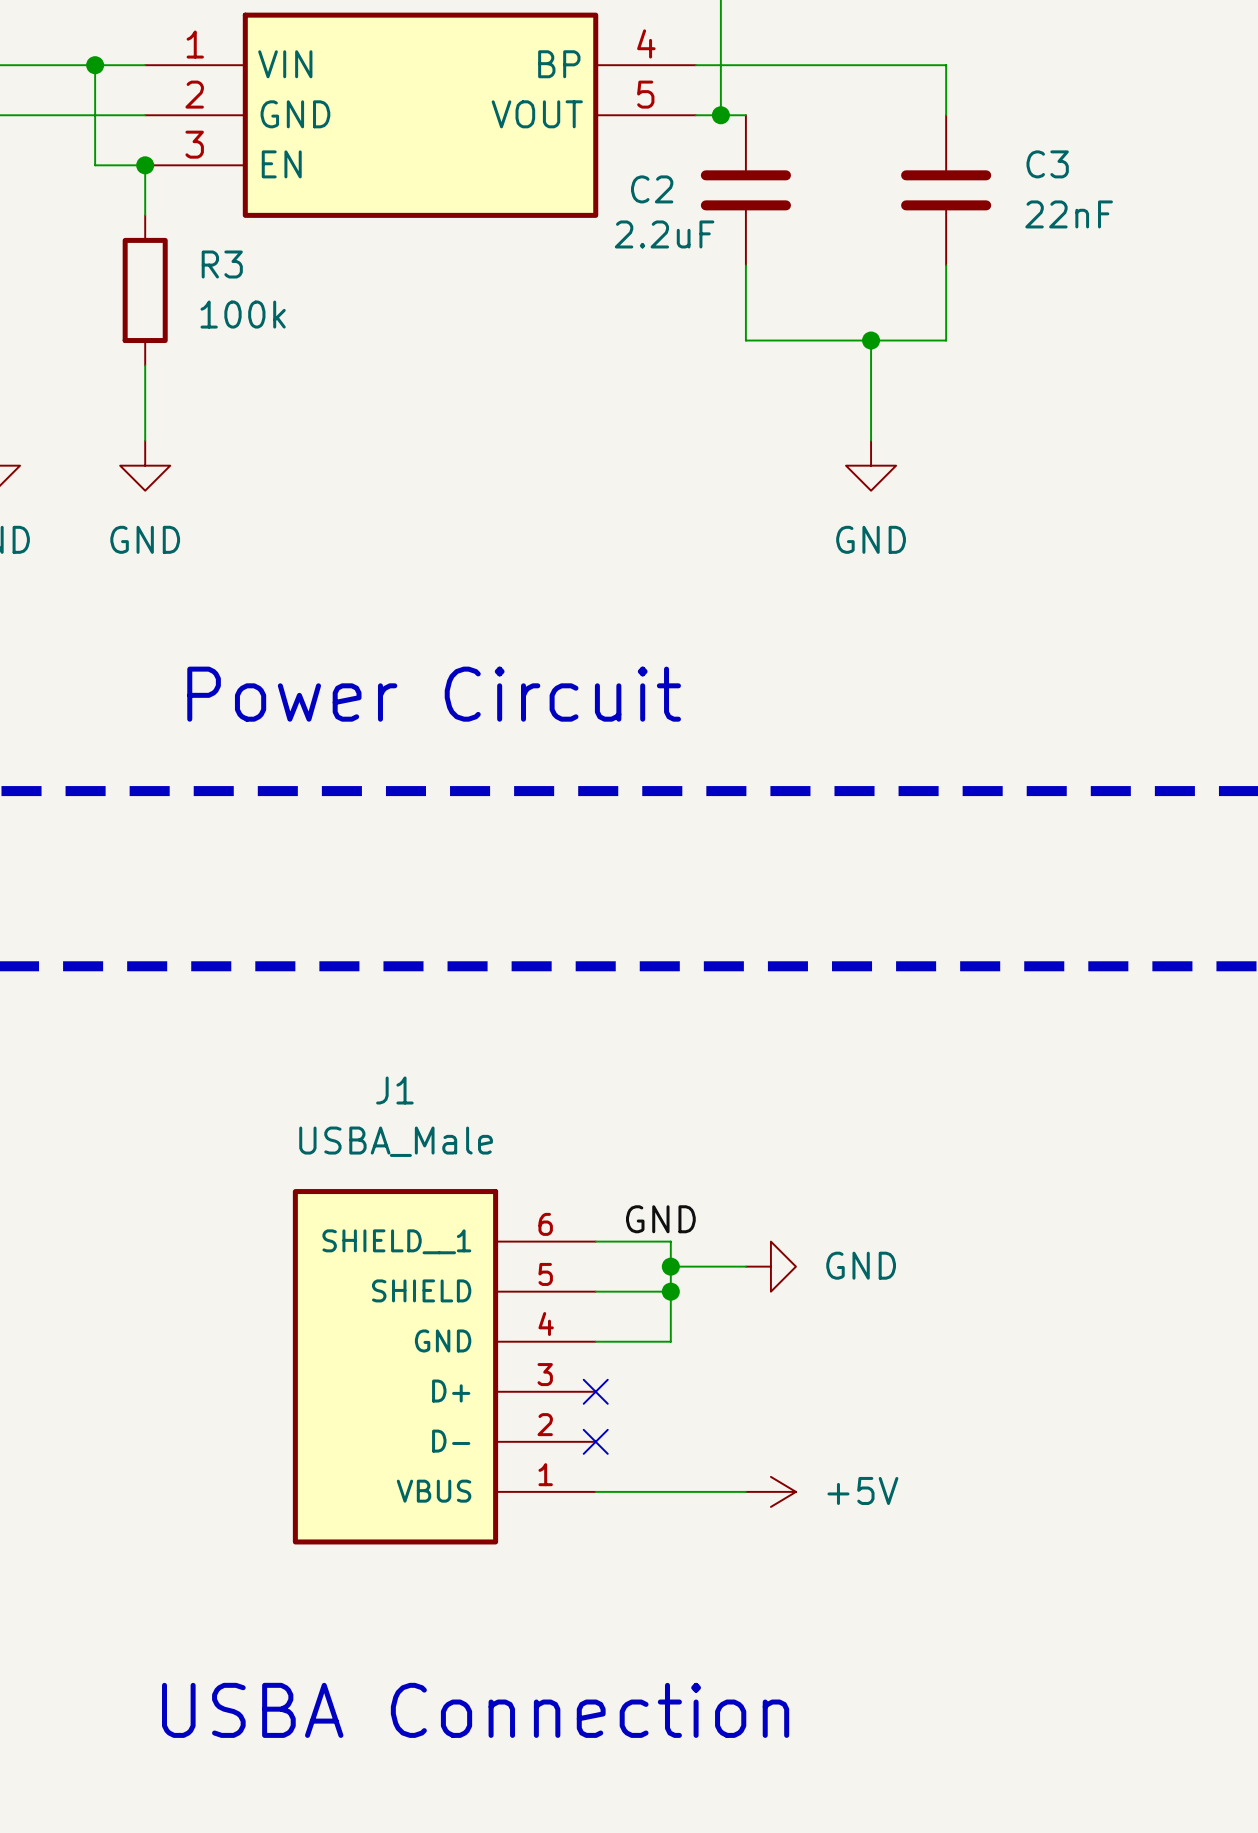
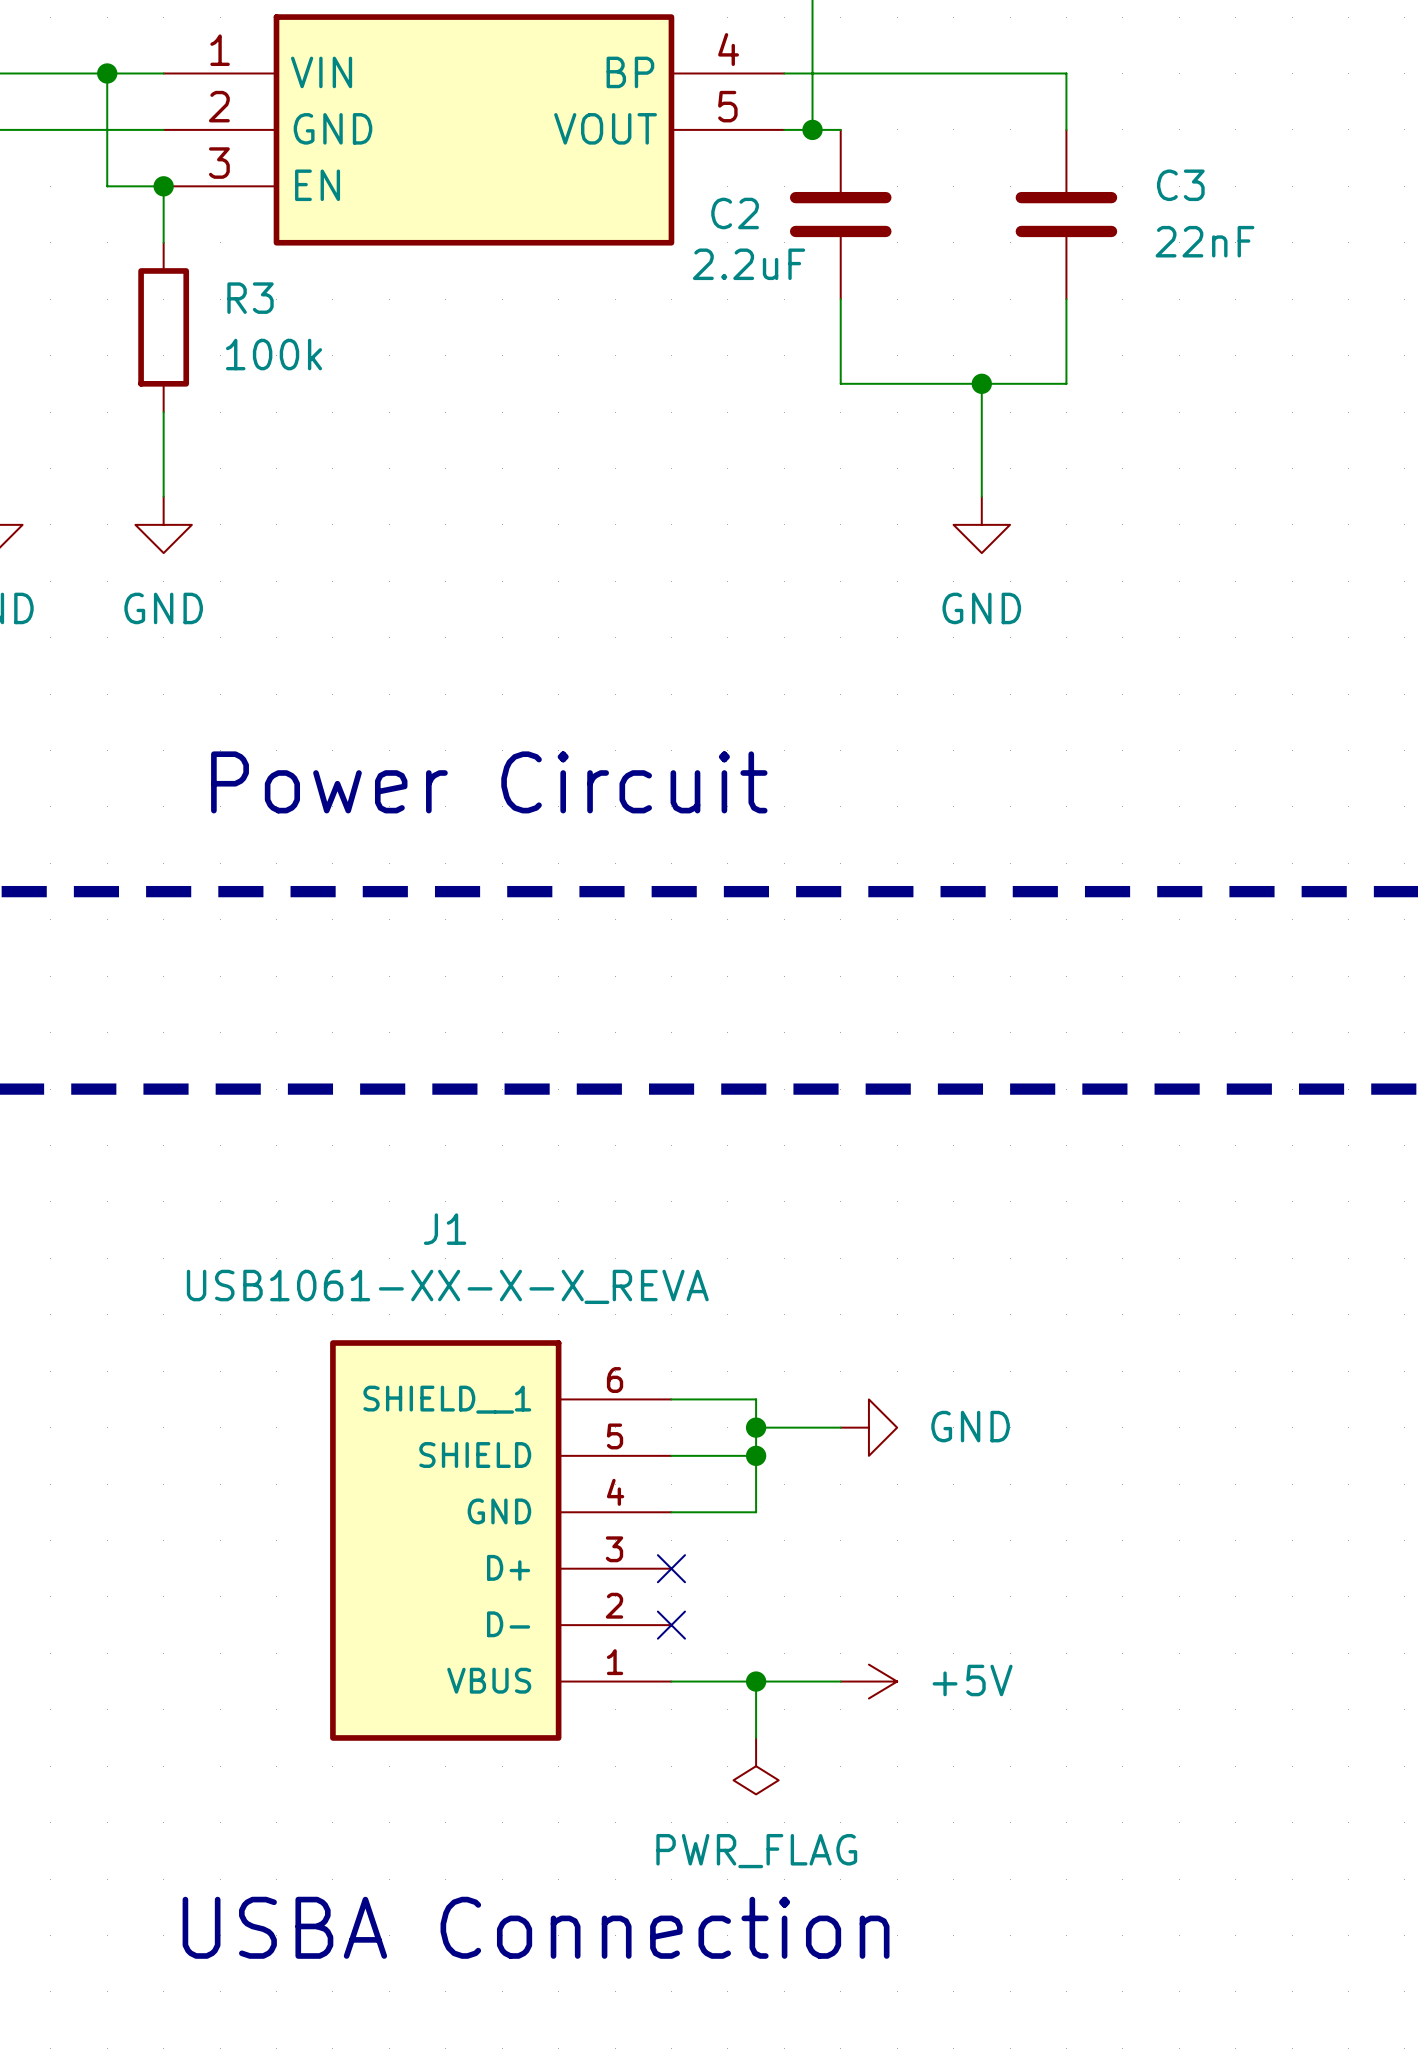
J1 value: USBA_Male (396, 1141) -> USB1061-XX-X-X_REVA (447, 1286)
label: GND (660, 1219) -> none
wire: none -> (756, 1681) (756, 1737)
junction: none -> (756, 1681)
power symbol: none -> PWR_FLAG (756, 1766)

